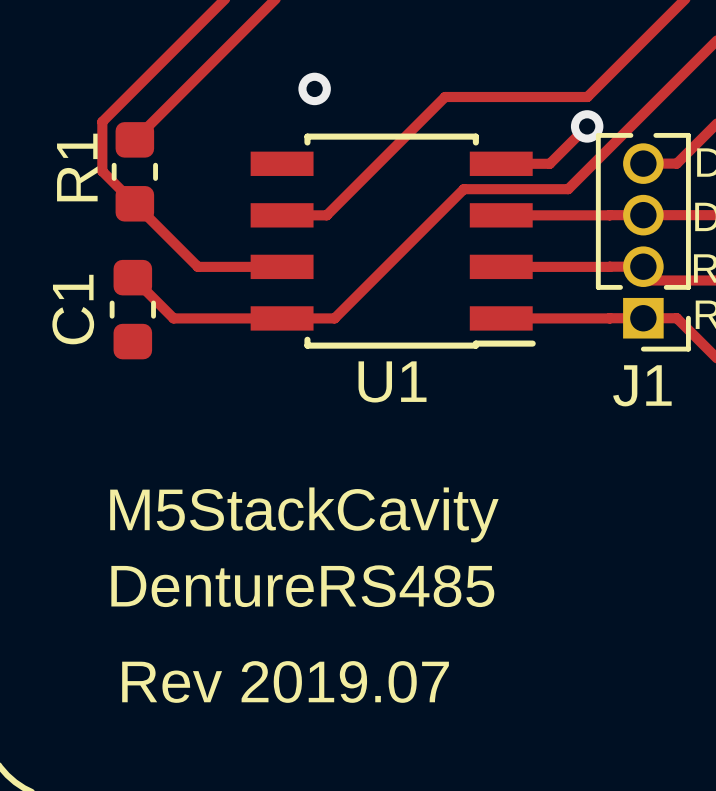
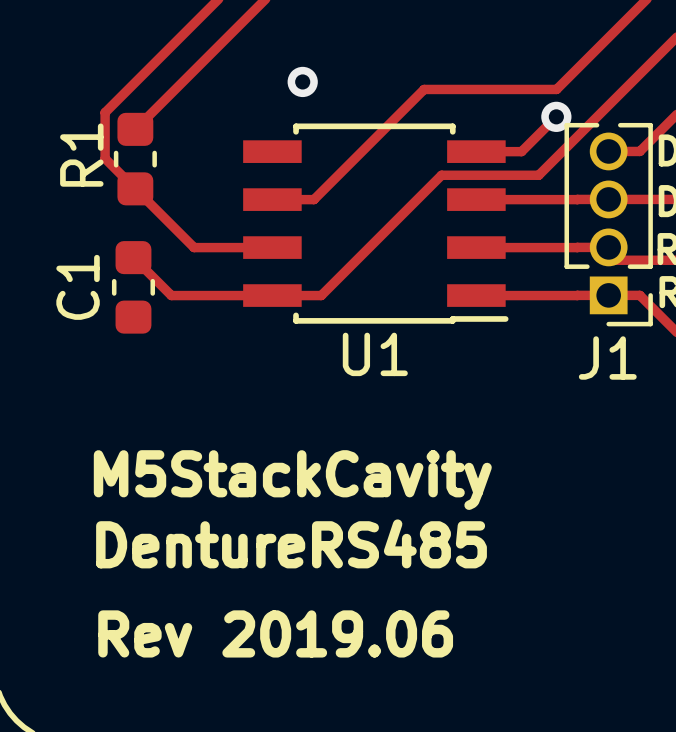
text: Rev 2019.07 (285, 681) -> Rev 2019.06 (275, 633)

